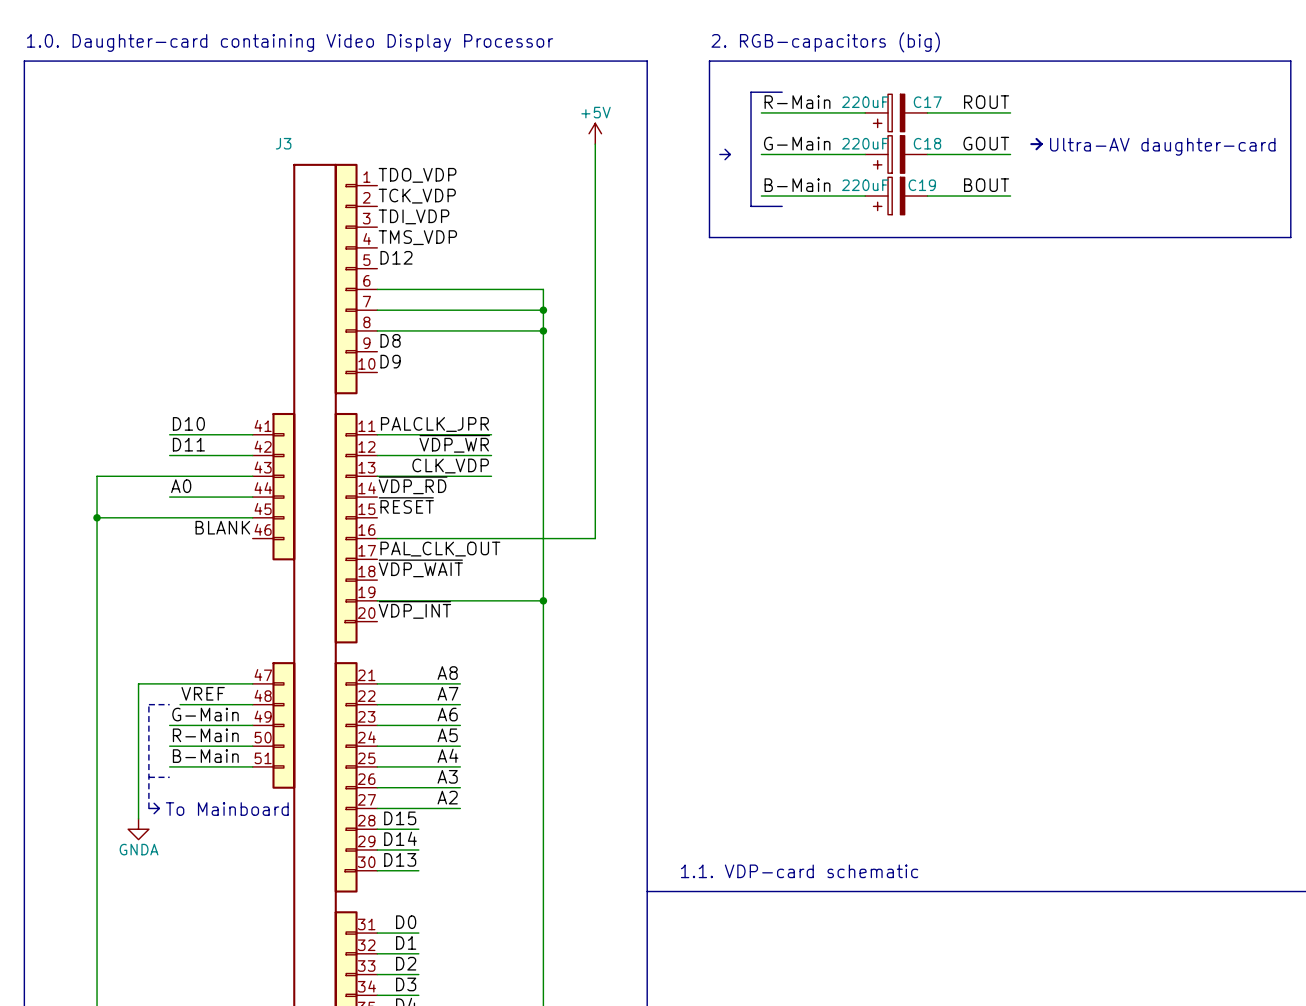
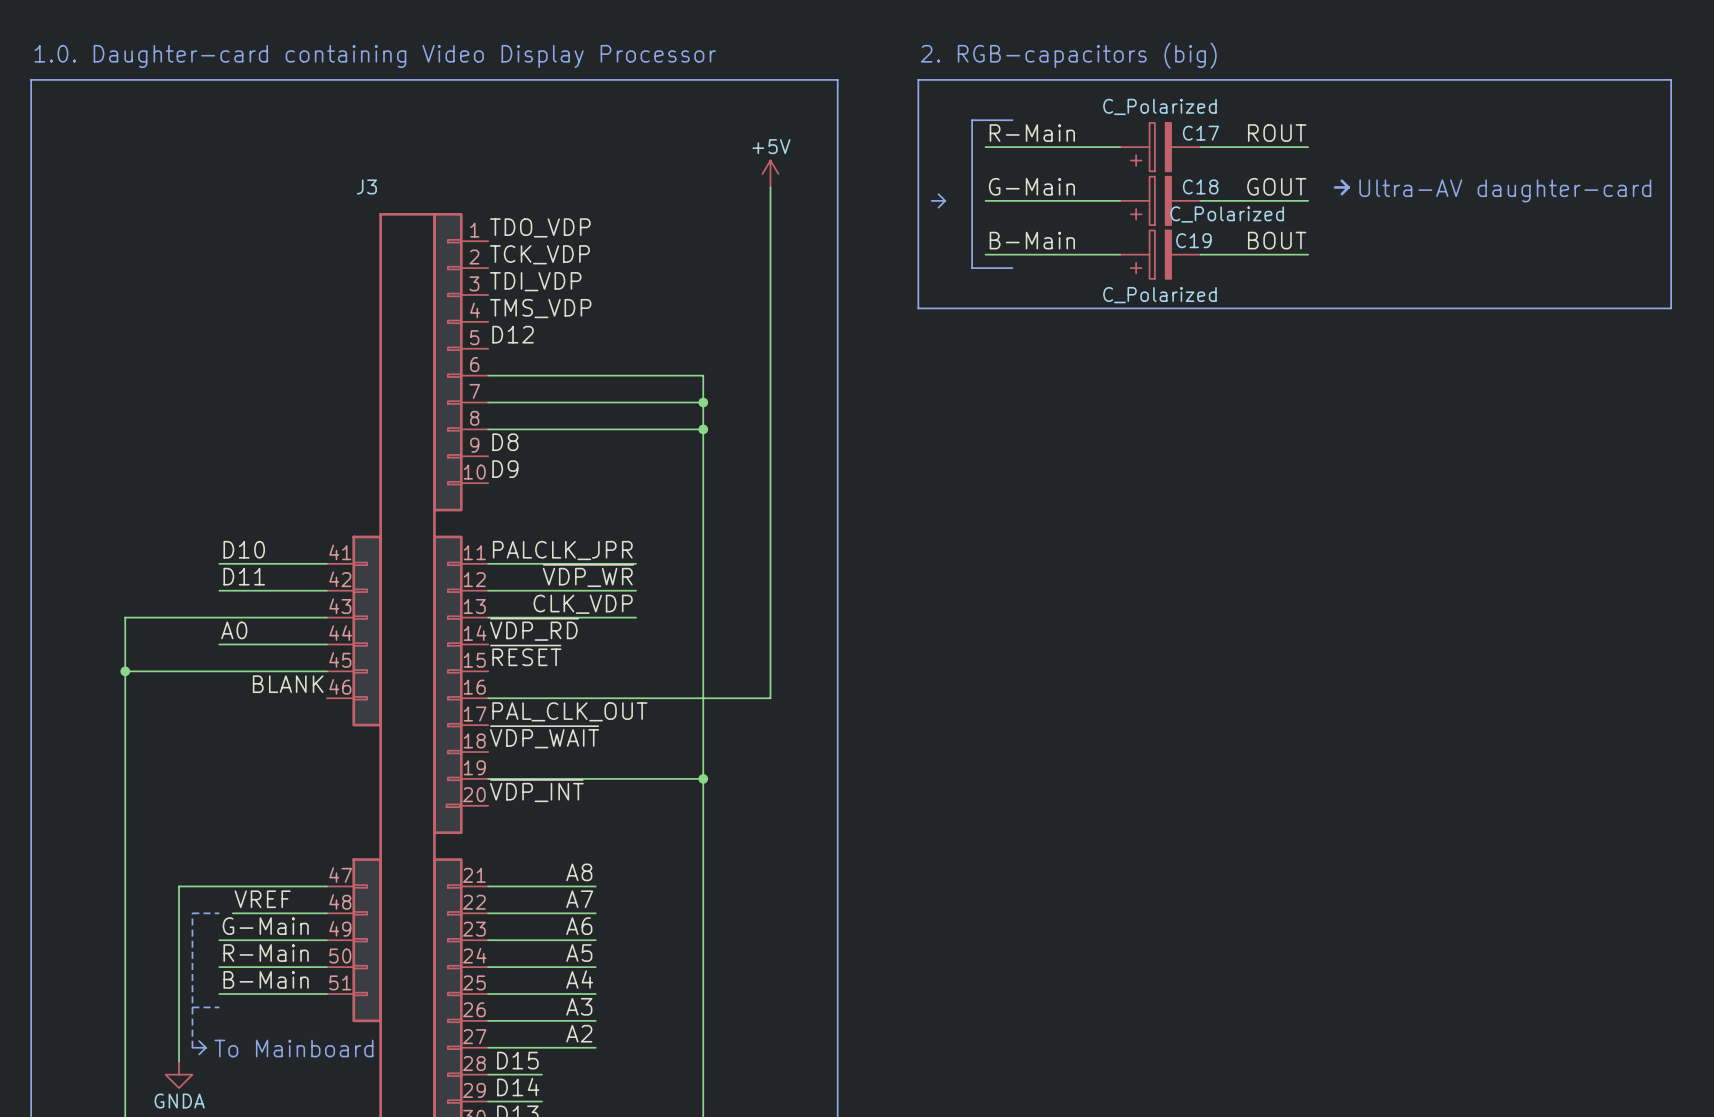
C17 value: 220uF (865, 102) -> C_Polarized (1159, 106)
C18 value: 220uF (865, 143) -> C_Polarized (1227, 214)
C19 value: 220uF (865, 185) -> C_Polarized (1159, 295)

